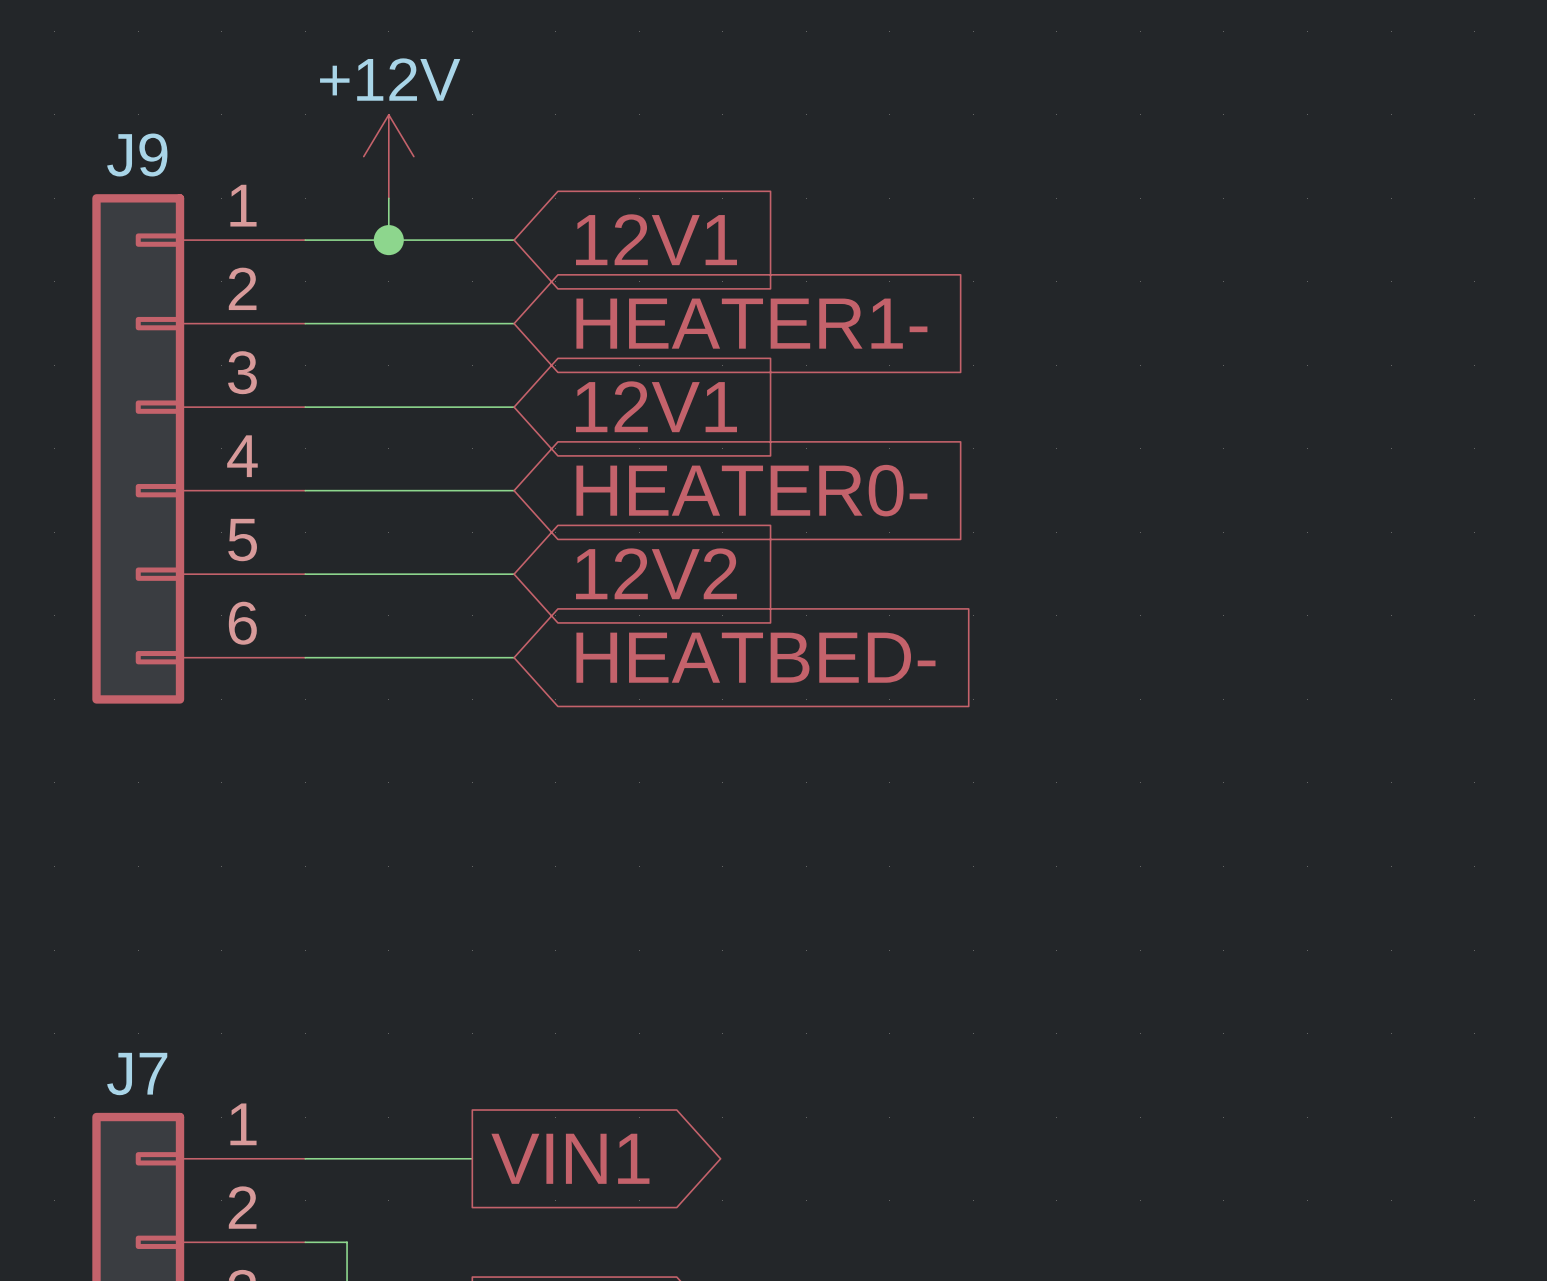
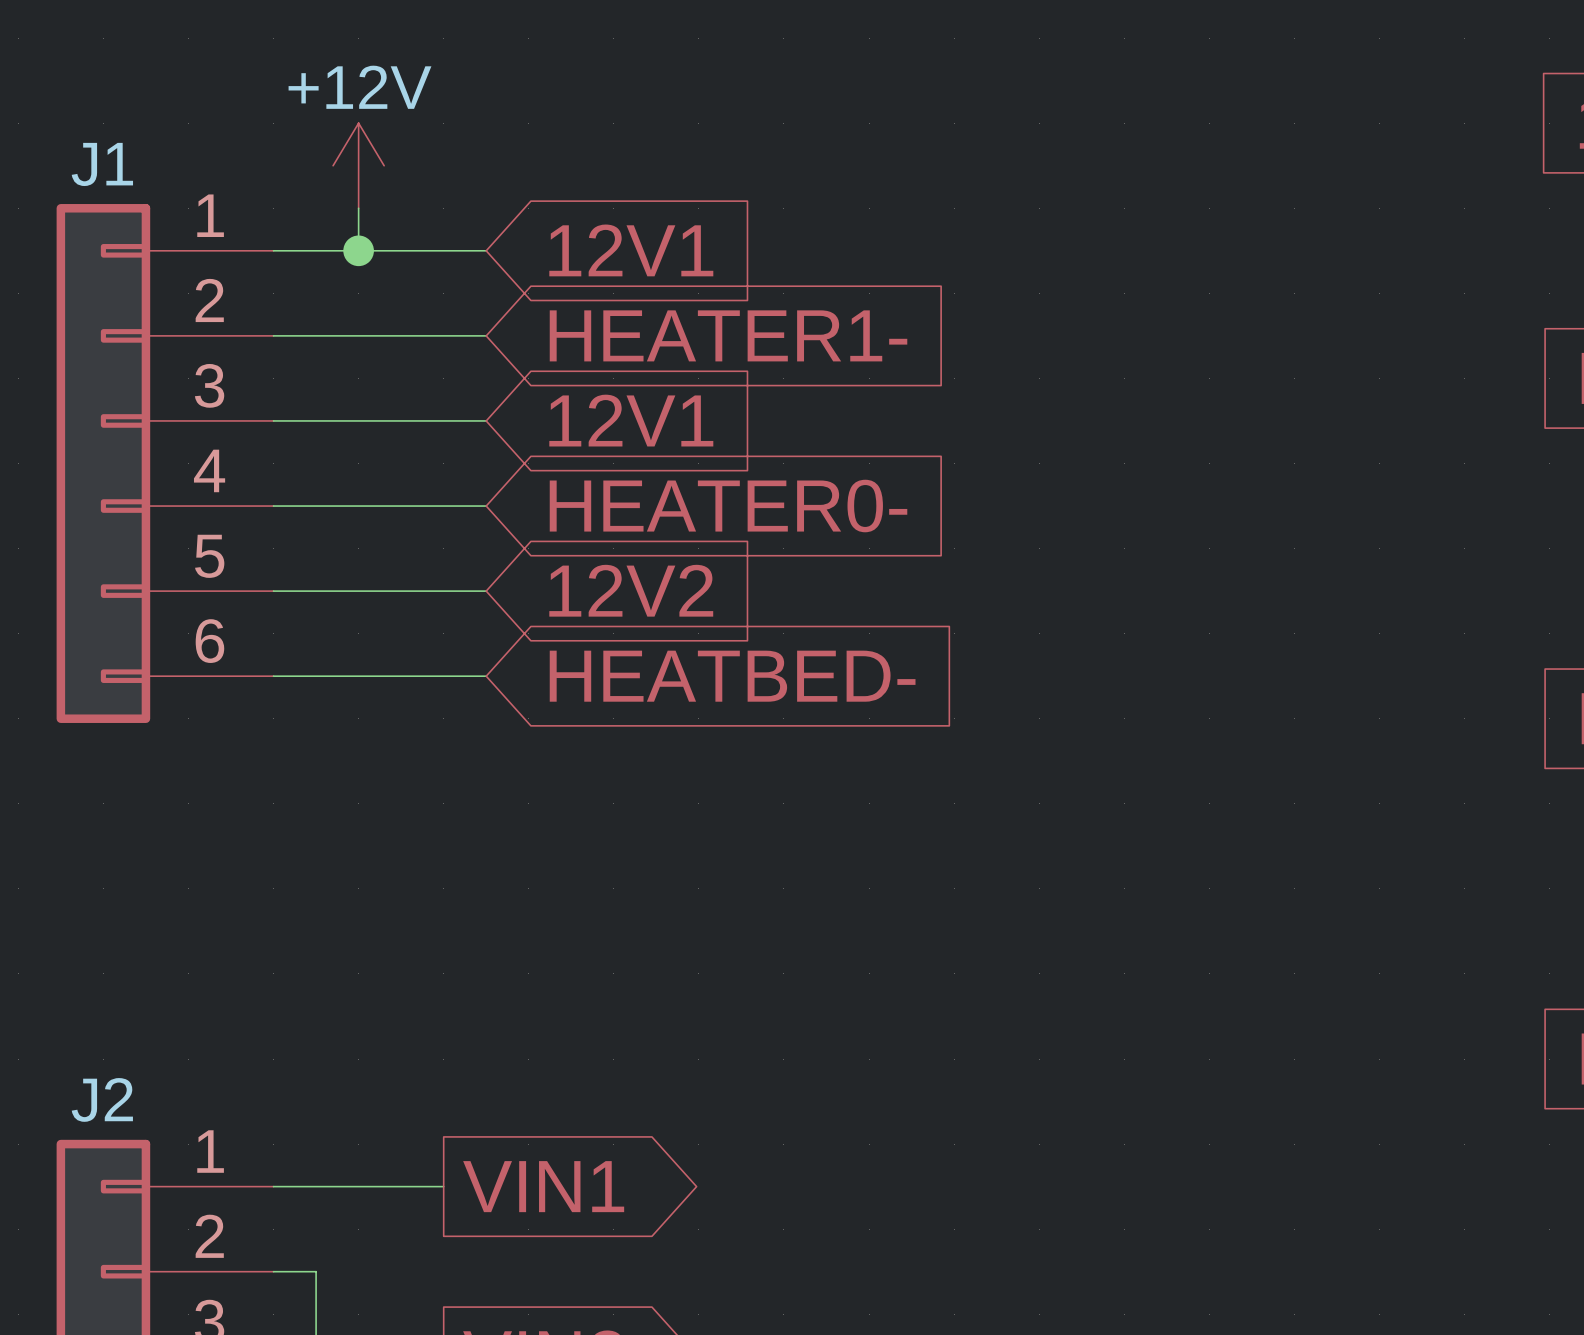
J9 name: J9 (137, 155) -> J1 (102, 164)
J7 name: J7 (137, 1074) -> J2 (102, 1099)

